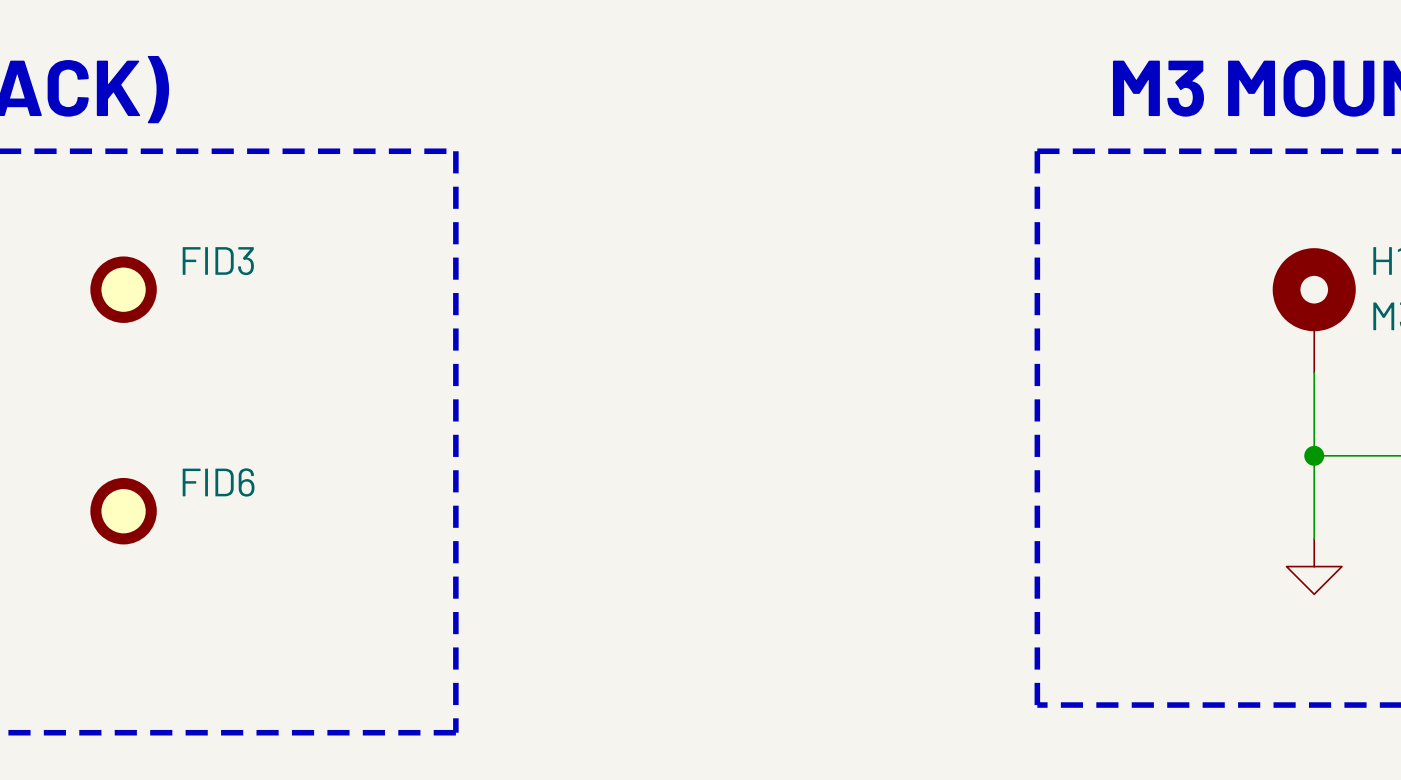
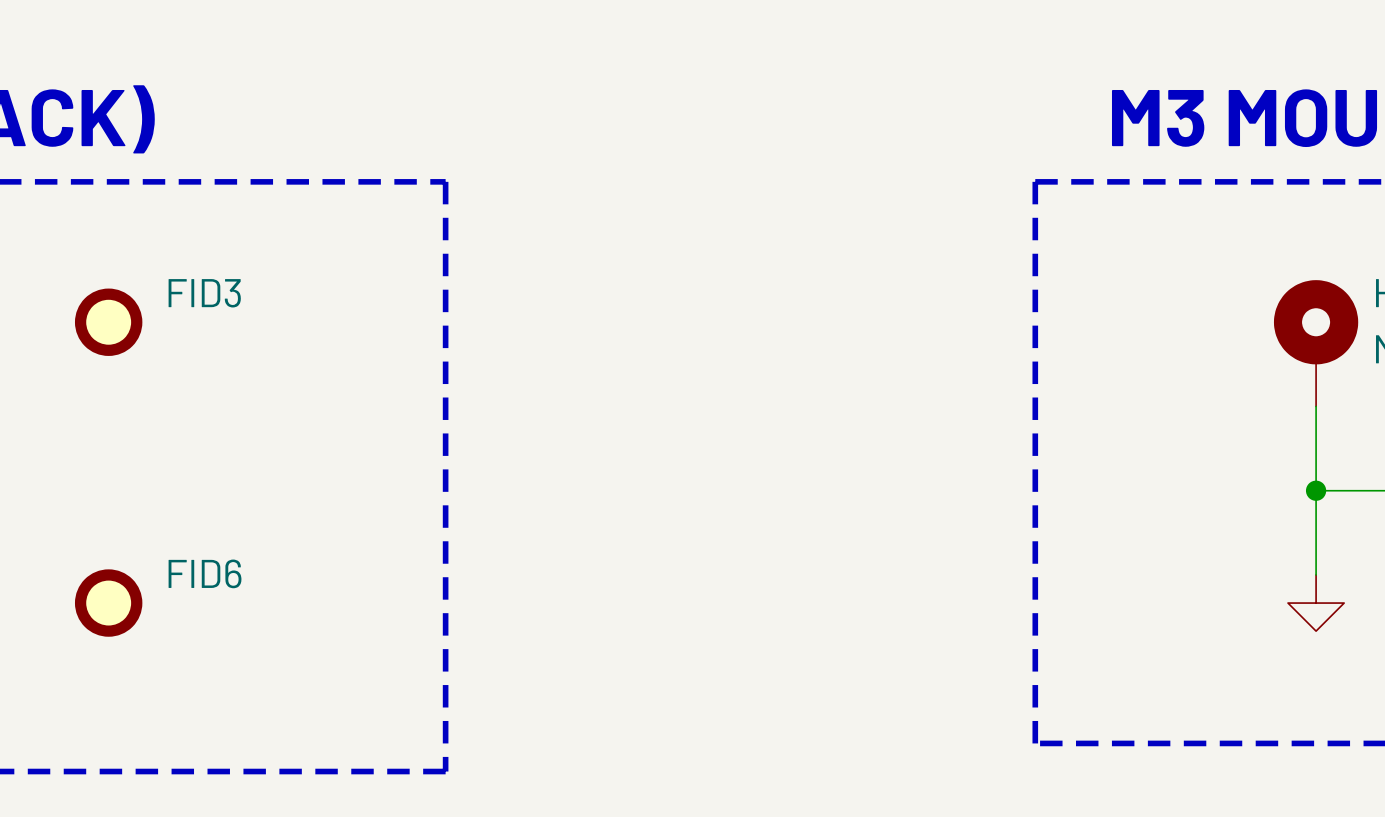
FID6 position: (123, 511) -> (108, 603)

